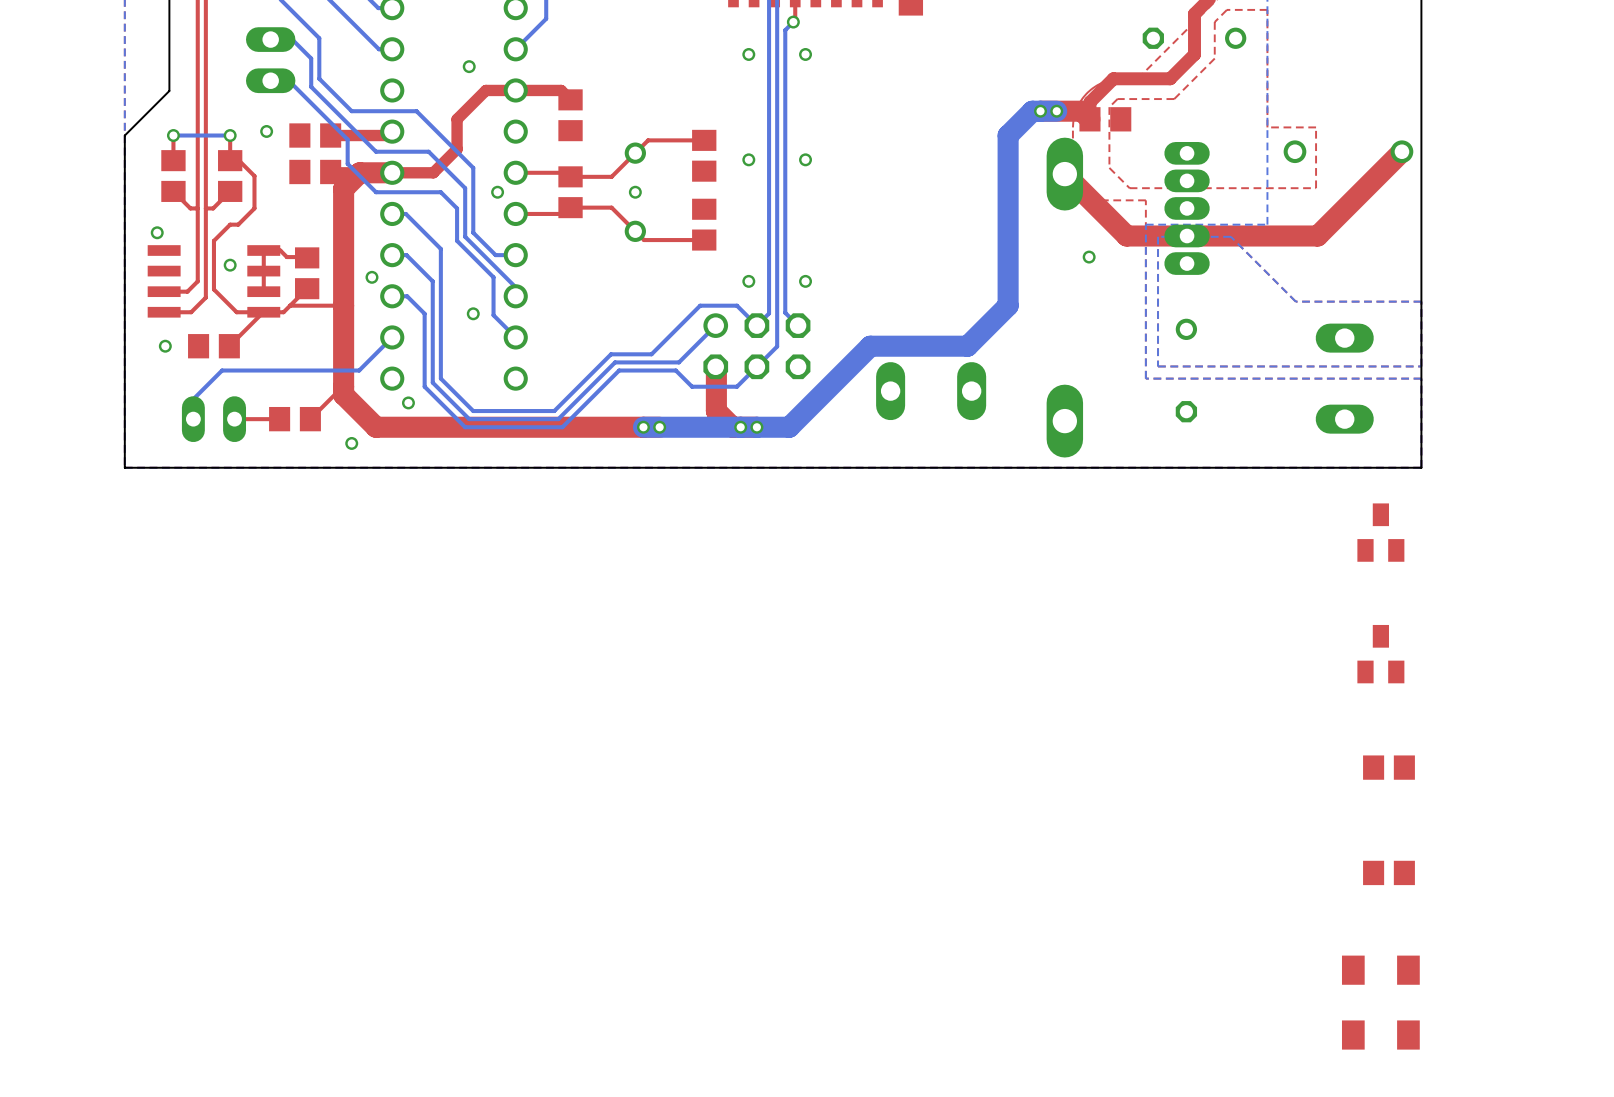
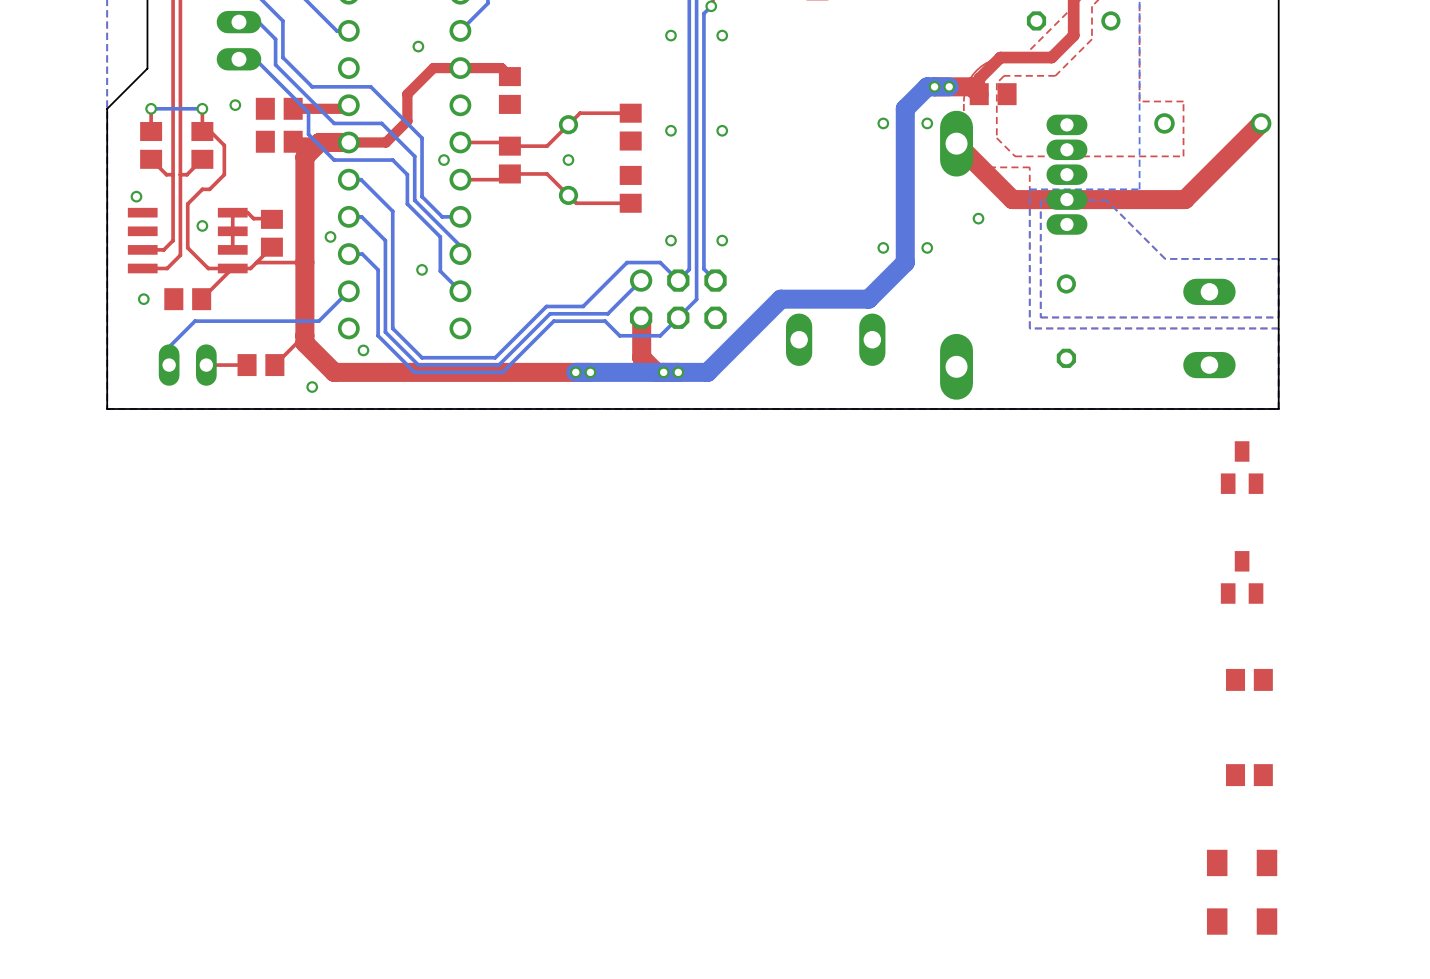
via: none -> (883, 123)
via: none -> (927, 123)
via: none -> (883, 247)
via: none -> (927, 247)

